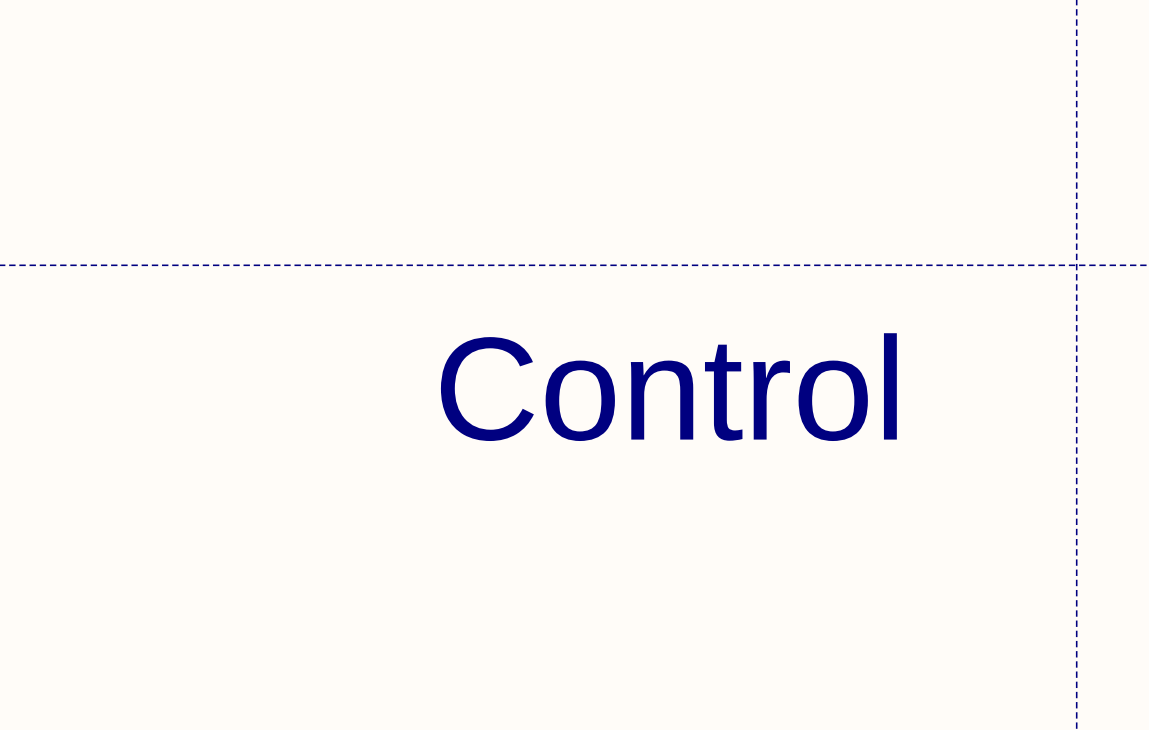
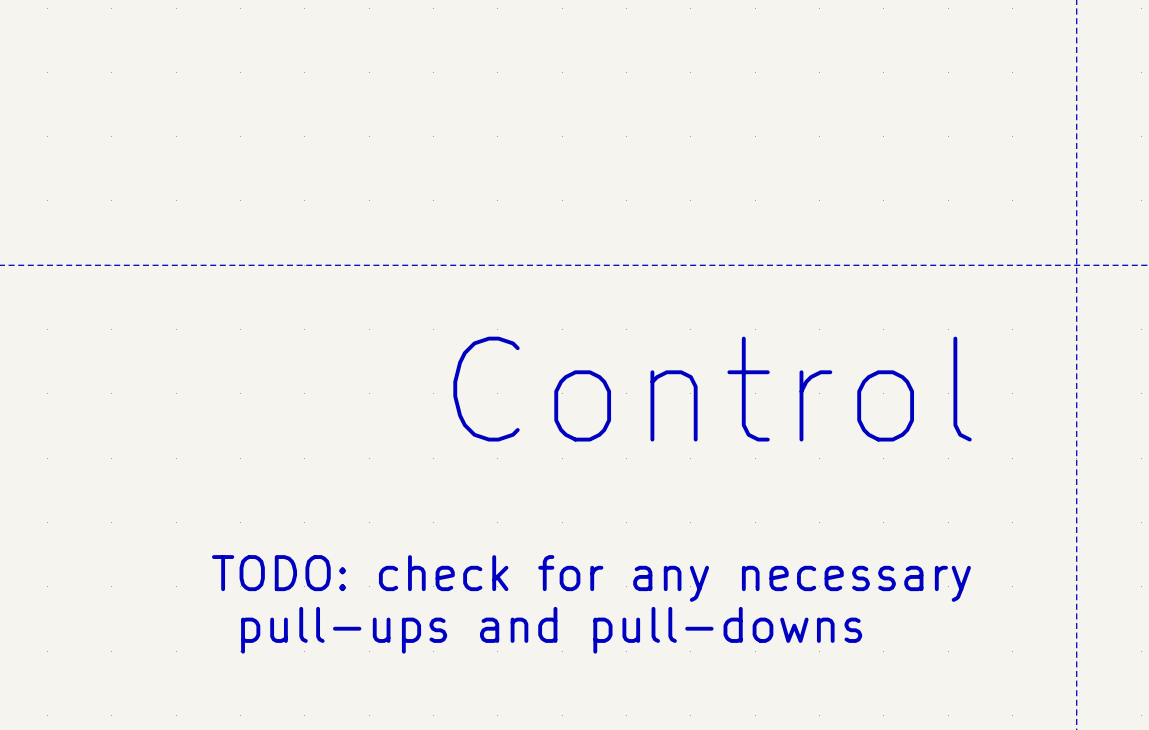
text: none -> TODO: check for any necessary (591, 578)
text: none -> pull-ups and pull-downs (551, 630)

